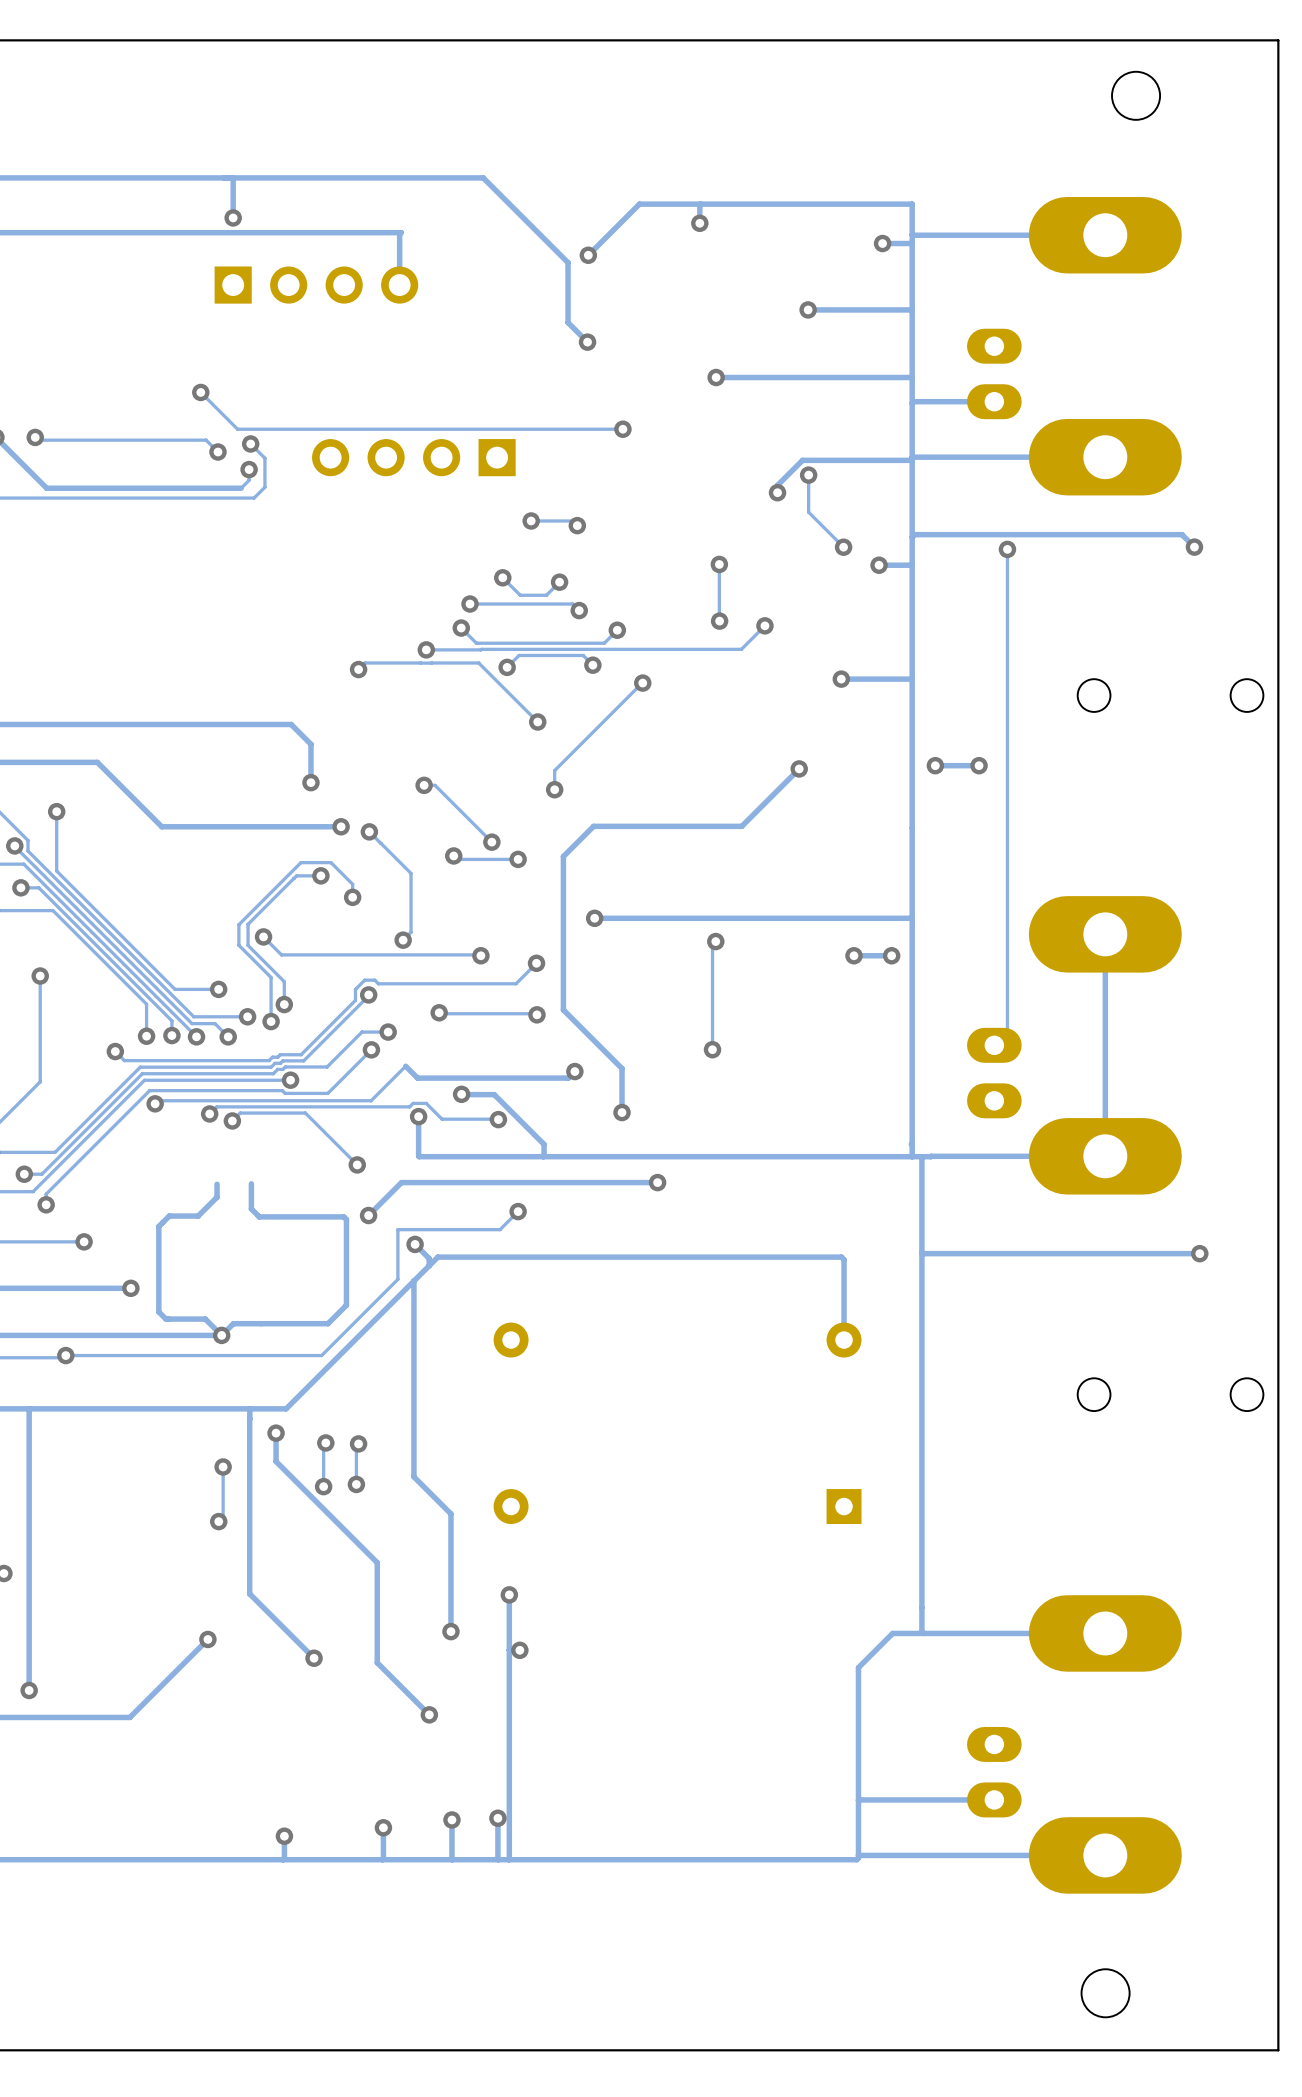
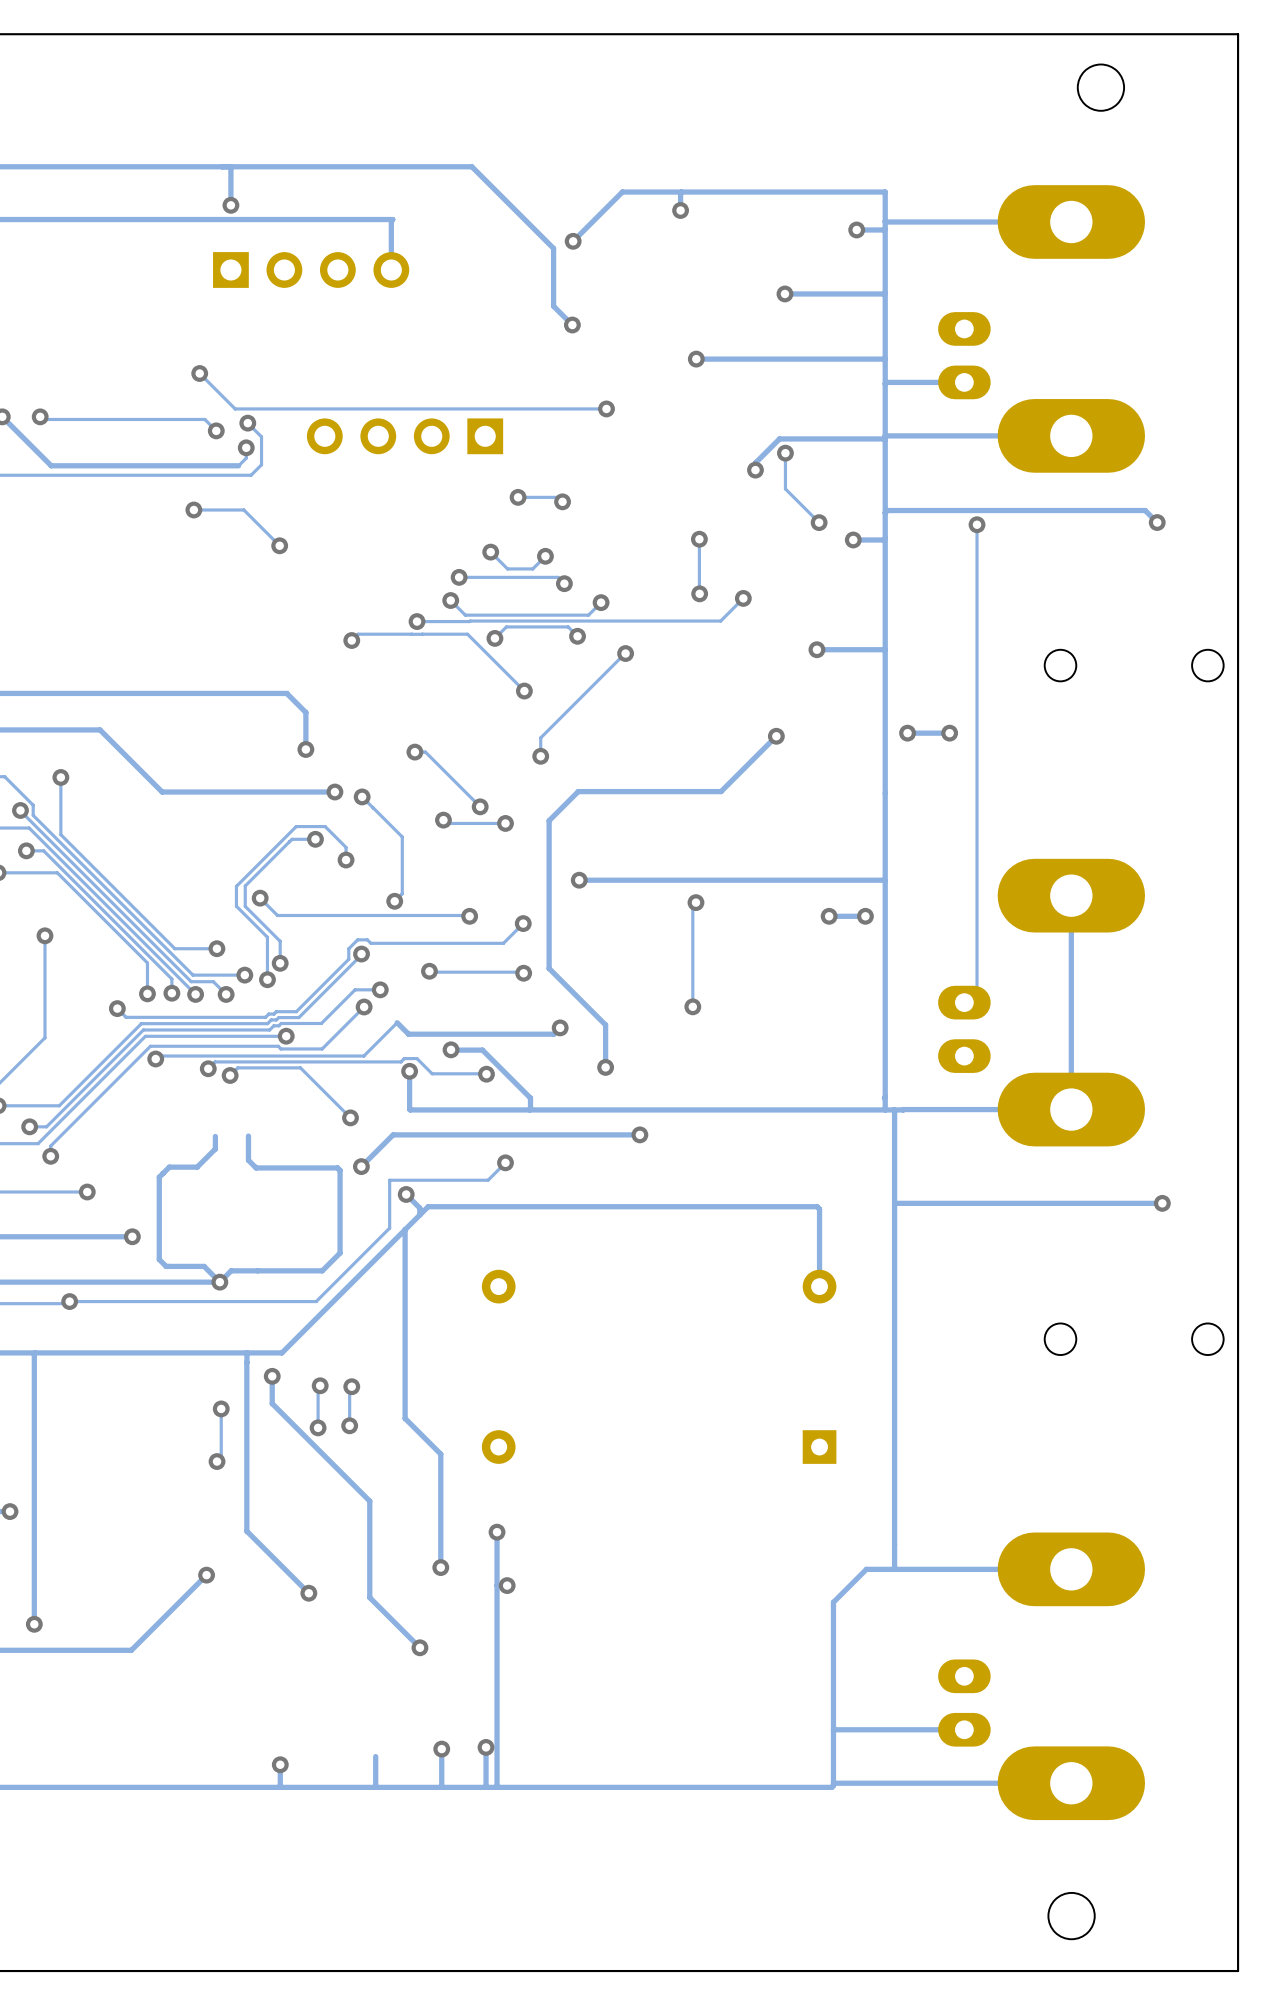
track: none -> (193, 509) (243, 509) (279, 545)
via: none -> (193, 509)
via: none -> (279, 545)
via: (383, 1827) -> none

